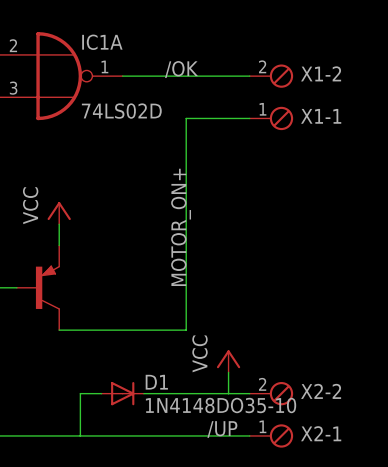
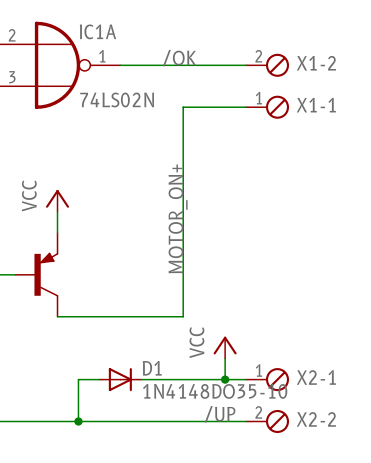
IC1A value: 74LS02D (121, 111) -> 74LS02N (117, 99)
junction: none -> (225, 379)
X2-2 position: (271, 393) -> (267, 421)
junction: none -> (78, 421)
X2-1 position: (271, 435) -> (267, 379)

